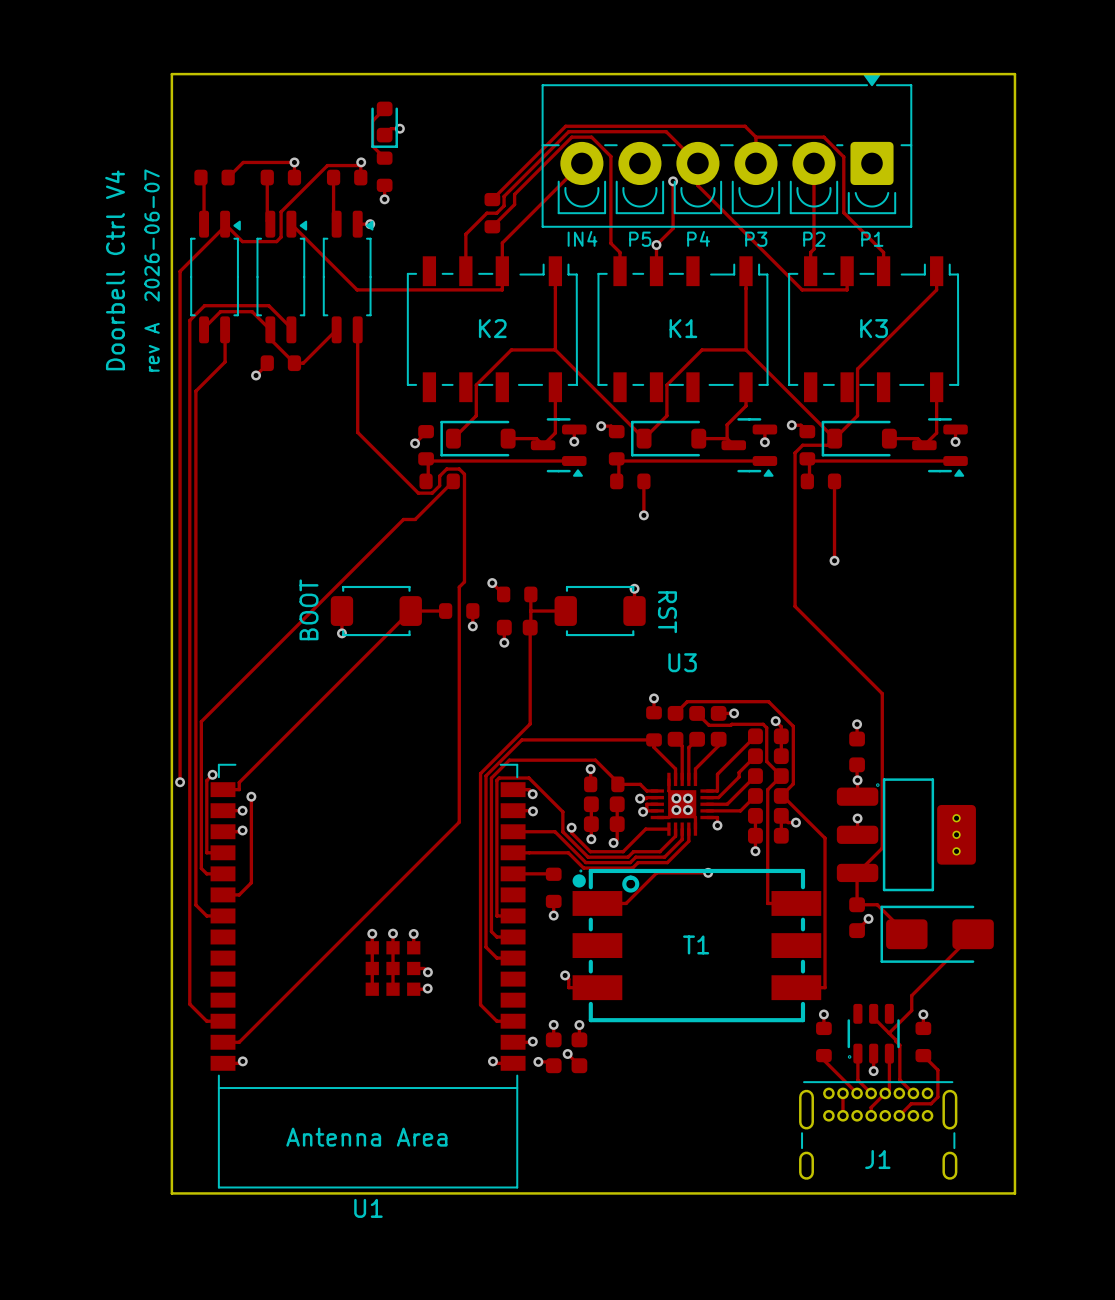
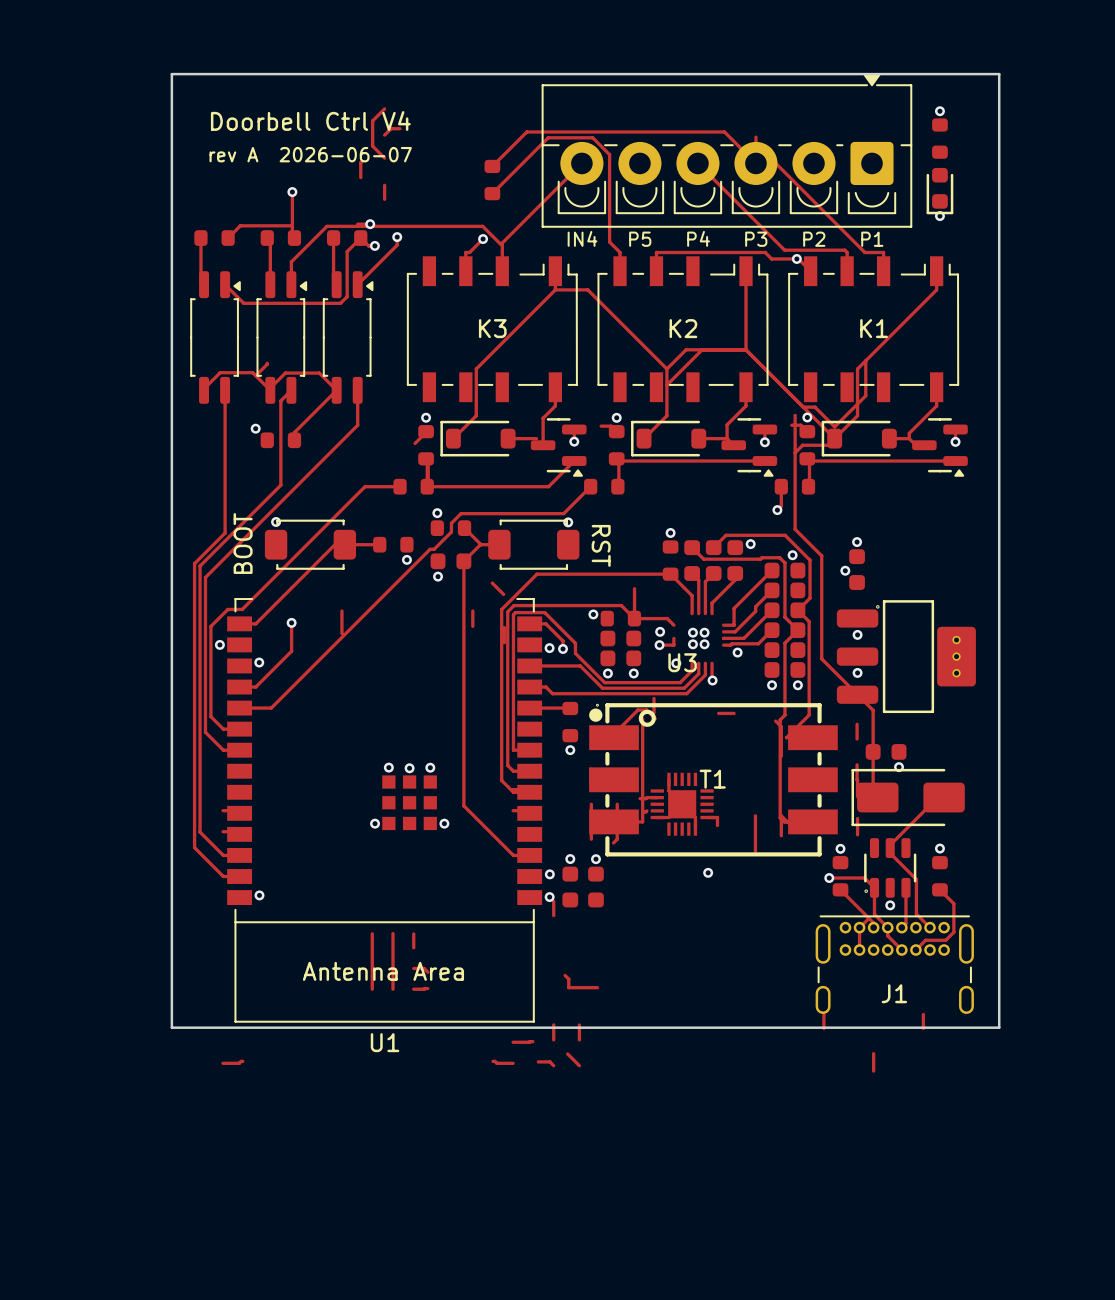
board edge: (999, 74) (1014, 74) (1014, 1193) (171, 1193) (171, 1027) -> (999, 74) (999, 1027) (171, 1027)
via: none -> (939, 111)
part: (384, 124) -> none
via: (399, 128) -> none
part: none -> (939, 138)
via position: (294, 162) -> (292, 192)
via: (361, 162) -> none
track: (813, 163) (813, 249) (810, 252) (810, 271) -> none
track: (360, 165) (327, 165) (281, 211) (281, 237) (276, 241) (242, 241) (225, 224) (225, 226) (180, 271) (180, 782) -> none
part: (384, 171) -> none
track: (200, 177) (204, 180) (204, 224) -> (267, 238) (270, 241) (270, 284)
part: (214, 177) -> none
track: (228, 177) (243, 162) (294, 162) (294, 177) -> none
track: (267, 177) (267, 221) (270, 224) -> (333, 238) (333, 281) (336, 284)
part: (280, 177) -> none
track: (333, 177) (333, 221) (336, 224) -> (200, 238) (200, 281) (204, 284)
part: (347, 177) -> none
track: (673, 181) (673, 228) (656, 245) (656, 252) -> (810, 271) (798, 258) (771, 258) (765, 252) (656, 252)
via: (673, 181) -> none
part: none -> (939, 191)
track: none -> (292, 192) (292, 235) (294, 238)
via: (384, 199) -> none
track: (492, 199) (565, 126) (745, 126) (755, 137) (823, 137) (843, 157) (843, 212) (883, 252) -> (492, 166) (526, 131) (724, 131) (755, 163) (775, 163) (864, 252) (883, 252)
part position: (492, 213) -> (492, 180)
via: none -> (939, 216)
track: (291, 224) (357, 289) (502, 289) (502, 271) -> none
track: none -> (292, 225) (240, 225) (228, 238)
track: (492, 226) (514, 204) (514, 194) (571, 137) (591, 137) (610, 156) (610, 243) -> (492, 193) (548, 137) (592, 137) (609, 154) (610, 243)
track: none -> (397, 237) (397, 245) (357, 284)
via: none -> (397, 237)
part: none -> (214, 238)
part: none -> (280, 238)
part: none -> (347, 238)
track: none -> (483, 239) (469, 252) (465, 252)
via: none -> (483, 239)
track: none -> (500, 244) (482, 226) (326, 226) (291, 261) (291, 284)
track: none -> (374, 245) (368, 245) (360, 238) (347, 251) (347, 296) (340, 303) (243, 303) (225, 284)
via: none -> (374, 245)
via: (656, 245) -> none
track: (465, 252) (465, 234) (486, 213) (496, 213) (504, 205) (504, 196) (568, 131) (666, 131) (697, 163) (697, 185) (802, 289) (847, 289) (847, 271) -> (697, 163) (784, 250) (844, 250) (847, 252) (847, 271)
via: none -> (796, 258)
text rotation: 0° (115, 270) -> 90° clockwise (310, 120)
text rotation: 0° (152, 270) -> 90° clockwise (310, 154)
part: (215, 277) -> none
part: (281, 277) -> none
part: (348, 277) -> none
track: (555, 289) (555, 349) -> none
K2 name: K2 (492, 328) -> K3 (492, 328)
K1 name: K1 (683, 328) -> K2 (683, 328)
K3 name: K3 (874, 328) -> K1 (874, 328)
track: (204, 329) (220, 311) (252, 311) (270, 329) (270, 339) (294, 363) (303, 363) (336, 329) -> none
track: (225, 329) (225, 361) (195, 391) (195, 905) (206, 915) (223, 915) -> none
track: (291, 329) (268, 305) (204, 305) (189, 320) (189, 1004) (206, 1021) (223, 1021) -> none
track: (357, 329) (357, 390) -> none
part: none -> (215, 337)
part: none -> (281, 337)
part: none -> (348, 337)
track: (555, 349) (511, 349) (476, 385) -> (666, 369) (587, 289) (555, 289) (476, 369) (476, 385)
track: (555, 349) (644, 438) -> none
track: none -> (865, 360) (865, 395) (834, 426) (814, 407) (803, 407) (746, 349) (686, 349) (666, 369)
part: (280, 363) -> none
track: none -> (666, 369) (666, 385)
via position: (256, 375) -> (255, 428)
track: none -> (204, 390) (220, 372) (252, 372) (270, 390) (285, 373) (319, 373) (336, 390) (294, 432) (294, 440)
track: none -> (225, 390) (225, 533) (194, 563) (194, 847) (223, 876) (239, 876)
track: none -> (291, 390) (280, 400) (280, 485) (200, 566) (200, 832) (223, 855) (239, 855)
track: (555, 405) (555, 432) (543, 445) (536, 438) -> (555, 405) (543, 418) (543, 445)
track: (936, 405) (936, 432) (924, 445) (917, 438) (909, 438) -> (936, 405) (909, 433) (909, 438) (915, 445) (924, 445)
track: (357, 425) (357, 432) (418, 493) (432, 493) (439, 485) (439, 476) (446, 469) (459, 469) (464, 474) (464, 581) (459, 587) (459, 822) (239, 1042) (223, 1042) -> (357, 425) (205, 577) (205, 732) (223, 750) (239, 750)
via position: (791, 425) -> (807, 417)
via position: (601, 426) -> (616, 417)
part: none -> (280, 440)
via position: (415, 443) -> (426, 417)
track: (428, 461) (574, 461) -> (427, 460) (427, 486) (548, 486) (574, 461)
part: (439, 481) -> none
track: (453, 481) (415, 519) (403, 519) (201, 721) (201, 868) (206, 873) (223, 873) -> none
part position: (630, 481) -> (604, 486)
track: (643, 481) (643, 515) -> none
part position: (820, 481) -> (794, 486)
track: (834, 481) (834, 560) -> none
track: none -> (400, 486) (365, 486) (242, 609) (227, 609) (210, 626) (210, 716) (223, 729) (239, 729)
part: none -> (413, 486)
track: none -> (590, 486) (563, 513) (461, 513) (451, 523) (451, 532) (434, 549) (430, 549) (271, 708) (239, 708)
track: none -> (781, 486) (781, 506) (777, 510)
via: none -> (777, 510)
via: none -> (437, 513)
via position: (643, 515) -> (670, 532)
via: none -> (276, 521)
via: none -> (568, 522)
part: none -> (450, 528)
track: none -> (464, 528) (481, 544) (499, 544)
track: (795, 529) (795, 606) (882, 693) (882, 848) (857, 873) (857, 904) (877, 904) (906, 934) -> (795, 529) (821, 555) (821, 658) (873, 710) (873, 792) (877, 797)
via: none -> (857, 542)
part: none -> (310, 544)
track: none -> (379, 544) (334, 544) (255, 623) (239, 623)
part: none -> (393, 544)
track: none -> (480, 544) (463, 561) (463, 805) (513, 855) (529, 855)
part: none -> (533, 544)
via: none -> (750, 544)
track: none -> (692, 547) (703, 559) (779, 557) (784, 562) (784, 617) (797, 630) (784, 643) (784, 715) (780, 719) (780, 817) (784, 821) (812, 821)
track: none -> (713, 547) (726, 535) (785, 535) (810, 560) (810, 598) (797, 610) (809, 621) (809, 715) (786, 737) (812, 737)
via: none -> (792, 555)
via: none -> (406, 559)
part: none -> (670, 560)
part: none -> (692, 560)
part: none -> (713, 560)
part: none -> (735, 560)
via: (834, 560) -> none
part: none -> (450, 561)
part: none -> (857, 569)
part: none -> (784, 570)
via: none -> (845, 570)
via: none -> (438, 576)
via: (492, 583) -> none
via: (634, 588) -> none
part: none -> (784, 590)
part: (517, 594) -> none
track: (530, 594) (530, 723) (480, 773) (480, 1004) (496, 1021) (513, 1021) -> none
text position: BOOT (309, 609) -> BOOT (243, 543)
part: none -> (784, 610)
part: (376, 611) -> none
track: (445, 611) (410, 611) (239, 782) (239, 789) (223, 789) -> none
part: (459, 611) -> none
track: (530, 611) (565, 611) -> none
part: (600, 611) -> none
text position: RST (667, 612) -> RST (601, 545)
track: none -> (692, 613) (692, 595) (670, 574) (537, 574) (501, 609) (501, 780) (513, 792) (529, 792)
via: none -> (593, 614)
part: none -> (620, 618)
track: none -> (291, 622) (291, 651) (255, 687) (239, 687)
via: none -> (291, 622)
track: none -> (529, 623) (545, 623) (563, 640) (563, 648)
track: none -> (673, 625) (667, 618) (634, 618) (621, 605) (513, 605) (507, 611) (507, 765) (513, 771) (529, 771)
via: (472, 626) -> none
part: (517, 627) -> none
track: none -> (772, 630) (758, 643) (723, 645)
part: none -> (784, 630)
via: none -> (660, 631)
via: none -> (692, 632)
via: none -> (704, 632)
via: (341, 633) -> none
via: none -> (857, 634)
part: none -> (620, 638)
track: none -> (673, 638) (673, 645) (659, 645)
via: (504, 642) -> none
via: none -> (219, 644)
via: none -> (692, 644)
via: none -> (704, 644)
via: none -> (659, 645)
via: none -> (549, 648)
via: none -> (563, 648)
part: none -> (784, 650)
via: none -> (737, 652)
part: none -> (620, 658)
via: none -> (259, 662)
via: none -> (676, 663)
track: none -> (692, 663) (692, 670) (680, 682) (604, 682) (575, 653) (575, 643) (544, 612) (515, 612) (513, 614) (513, 750) (529, 750)
track: none -> (698, 663) (698, 673) (684, 688) (602, 688) (580, 665) (529, 665)
track: none -> (705, 663) (705, 675) (686, 693) (552, 693) (545, 687) (529, 687)
track: none -> (712, 663) (712, 680)
part: none -> (784, 669)
via: none -> (857, 672)
via: none -> (607, 673)
via: none -> (633, 673)
via: none -> (712, 680)
via: none -> (772, 685)
via: none -> (797, 685)
via: (654, 698) -> none
track: (675, 713) (687, 701) (768, 701) (793, 726) (793, 783) (781, 795) (825, 838) (825, 987) (796, 987) -> none
track: (697, 713) (708, 725) (763, 724) (766, 727) (766, 761) (781, 776) (767, 789) (767, 903) (796, 903) -> none
via: (734, 713) -> none
track: none -> (642, 718) (642, 821) (614, 821)
track: none -> (655, 718) (646, 710) (638, 710) (614, 734) (614, 737)
via: (775, 721) -> none
part: none -> (570, 722)
via: (857, 724) -> none
part: (654, 726) -> none
part: (675, 726) -> none
part: (697, 726) -> none
part: (718, 726) -> none
track: (755, 736) (717, 774) (717, 790) (707, 790) -> (772, 570) (734, 608) (734, 625) (723, 625)
part: (768, 736) -> none
track: (675, 739) (682, 745) (682, 779) -> (692, 573) (698, 580) (698, 613)
track: (697, 739) (688, 747) (688, 779) -> (713, 573) (705, 581) (705, 613)
track: (718, 739) (718, 745) (695, 768) (695, 779) -> (735, 573) (735, 579) (712, 603) (712, 613)
part rotation: 0° (857, 751) -> 90° clockwise (886, 751)
part position: (857, 751) -> (886, 751)
track: (755, 756) (739, 772) (739, 777) (718, 797) (707, 797) -> (772, 590) (755, 606) (755, 611) (735, 631) (723, 631)
part: (768, 756) -> none
via: none -> (388, 767)
via: none -> (430, 767)
via: none -> (899, 767)
via: none -> (409, 768)
via position: (590, 769) -> (570, 750)
track: (212, 774) (206, 780) (206, 852) (223, 852) -> none
via: (212, 774) -> none
track: (755, 776) (727, 804) (707, 804) -> (772, 610) (743, 638) (723, 638)
part: (768, 776) -> none
track: (675, 779) (675, 768) (654, 747) (654, 739) (521, 739) (485, 775) (485, 947) (496, 958) (513, 958) -> none
via: (857, 780) -> none
via: (180, 782) -> none
part: (604, 784) -> none
track: (657, 790) (646, 790) (640, 784) (617, 784) (595, 760) (509, 760) (491, 778) (491, 931) (496, 937) (513, 937) -> none
via: (532, 794) -> none
track: (755, 795) (740, 810) (707, 810) -> none
part: (768, 795) -> none
track: (251, 796) (251, 882) (239, 894) (223, 894) -> none
via: (251, 796) -> none
track: none -> (944, 797) (937, 797) (890, 845) (890, 853) (916, 879) (916, 914) (930, 927)
via: (640, 798) -> none
via: (676, 798) -> none
via: (687, 798) -> none
part: (604, 804) -> none
track: (657, 804) (646, 804) (646, 810) (657, 810) -> none
via: (242, 810) -> none
via: (676, 810) -> none
via: (687, 810) -> none
via: (532, 811) -> none
via: (643, 811) -> none
part: (768, 815) -> none
via: (857, 818) -> none
via: (795, 822) -> none
via: none -> (375, 823)
via: none -> (444, 823)
part: (604, 824) -> none
via: (717, 825) -> none
track: (571, 827) (571, 832) (590, 851) (623, 851) (645, 829) (668, 829) -> none
via: (571, 827) -> none
track: (675, 829) (675, 836) (659, 851) (633, 851) (628, 857) (588, 857) (562, 831) (562, 811) (528, 778) (499, 778) (496, 780) (496, 915) (513, 915) -> none
track: (682, 829) (682, 839) (664, 857) (635, 857) (630, 862) (585, 862) (555, 831) (513, 831) -> none
track: (688, 829) (688, 841) (667, 862) (638, 862) (632, 868) (583, 868) (568, 852) (513, 852) -> none
via: (242, 830) -> none
part position: (906, 834) -> (906, 656)
part: (768, 835) -> none
via: (591, 839) -> none
via: (613, 842) -> none
via: none -> (840, 848)
via: none -> (939, 848)
via: (755, 851) -> none
via: none -> (570, 859)
via: none -> (595, 859)
track: (708, 872) (656, 872) (626, 903) (597, 903) -> none
track: (513, 873) (553, 874) -> (529, 708) (570, 708)
via: none -> (549, 874)
part: none -> (840, 876)
part: none -> (939, 876)
track: none -> (829, 878) (864, 878) (874, 887) (874, 914) (887, 927) (887, 935) (901, 950)
via: none -> (829, 878)
part: (553, 887) -> none
part: none -> (570, 887)
part: none -> (595, 887)
track: none -> (905, 887) (905, 923) (901, 927)
track: none -> (840, 889) (873, 923) (873, 927)
track: none -> (939, 889) (953, 903) (953, 932) (945, 940) (925, 940) (915, 950)
via: none -> (259, 895)
via position: (553, 915) -> (549, 897)
part: (857, 917) -> none
via position: (868, 918) -> (890, 905)
via: (372, 933) -> none
via: (393, 933) -> none
via: (413, 933) -> none
part position: (937, 934) -> (908, 797)
track: (973, 934) (911, 995) (911, 1010) (889, 1033) -> none
T1 position: (696, 945) -> (713, 779)
via: (427, 972) -> none
via: (565, 975) -> none
U1 position: (368, 976) -> (384, 810)
via: (427, 988) -> none
track: (873, 1013) (873, 1017) (889, 1033) -> none
via: (823, 1014) -> none
via: (923, 1014) -> none
via: (553, 1024) -> none
via: (579, 1025) -> none
part position: (873, 1033) -> (890, 867)
track: (889, 1033) (899, 1045) (899, 1079) (913, 1093) -> none
via: (532, 1041) -> none
part: (823, 1042) -> none
part: (923, 1042) -> none
part: (553, 1052) -> none
part: (579, 1052) -> none
via: (567, 1053) -> none
track: (857, 1053) (857, 1080) (871, 1093) -> none
track: (889, 1053) (889, 1089) (871, 1107) (871, 1115) -> none
track: (823, 1055) (823, 1060) (857, 1093) -> none
track: (923, 1055) (937, 1070) (937, 1096) (931, 1103) (911, 1103) (899, 1115) -> none
via: (242, 1061) -> none
via: (492, 1061) -> none
via: (538, 1061) -> none
via: (873, 1071) -> none
track: (842, 1093) (842, 1115) -> (859, 927) (859, 950)
J1 position: (878, 1130) -> (894, 964)

